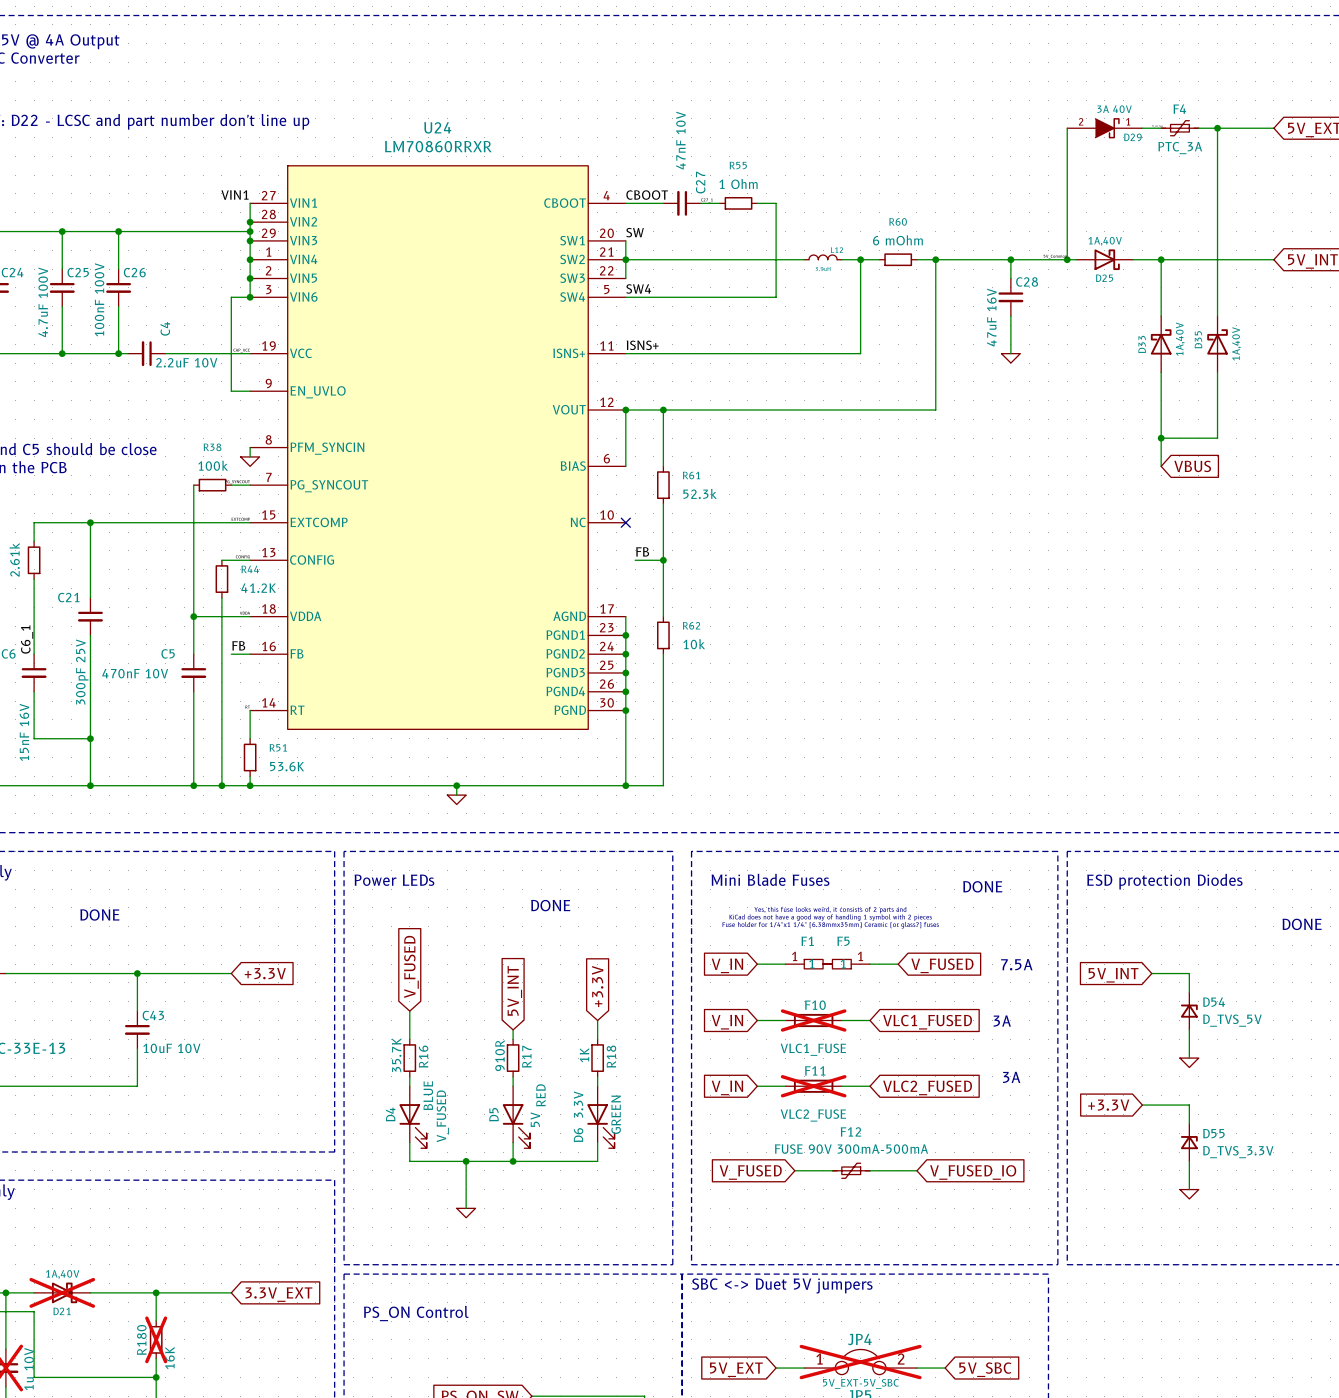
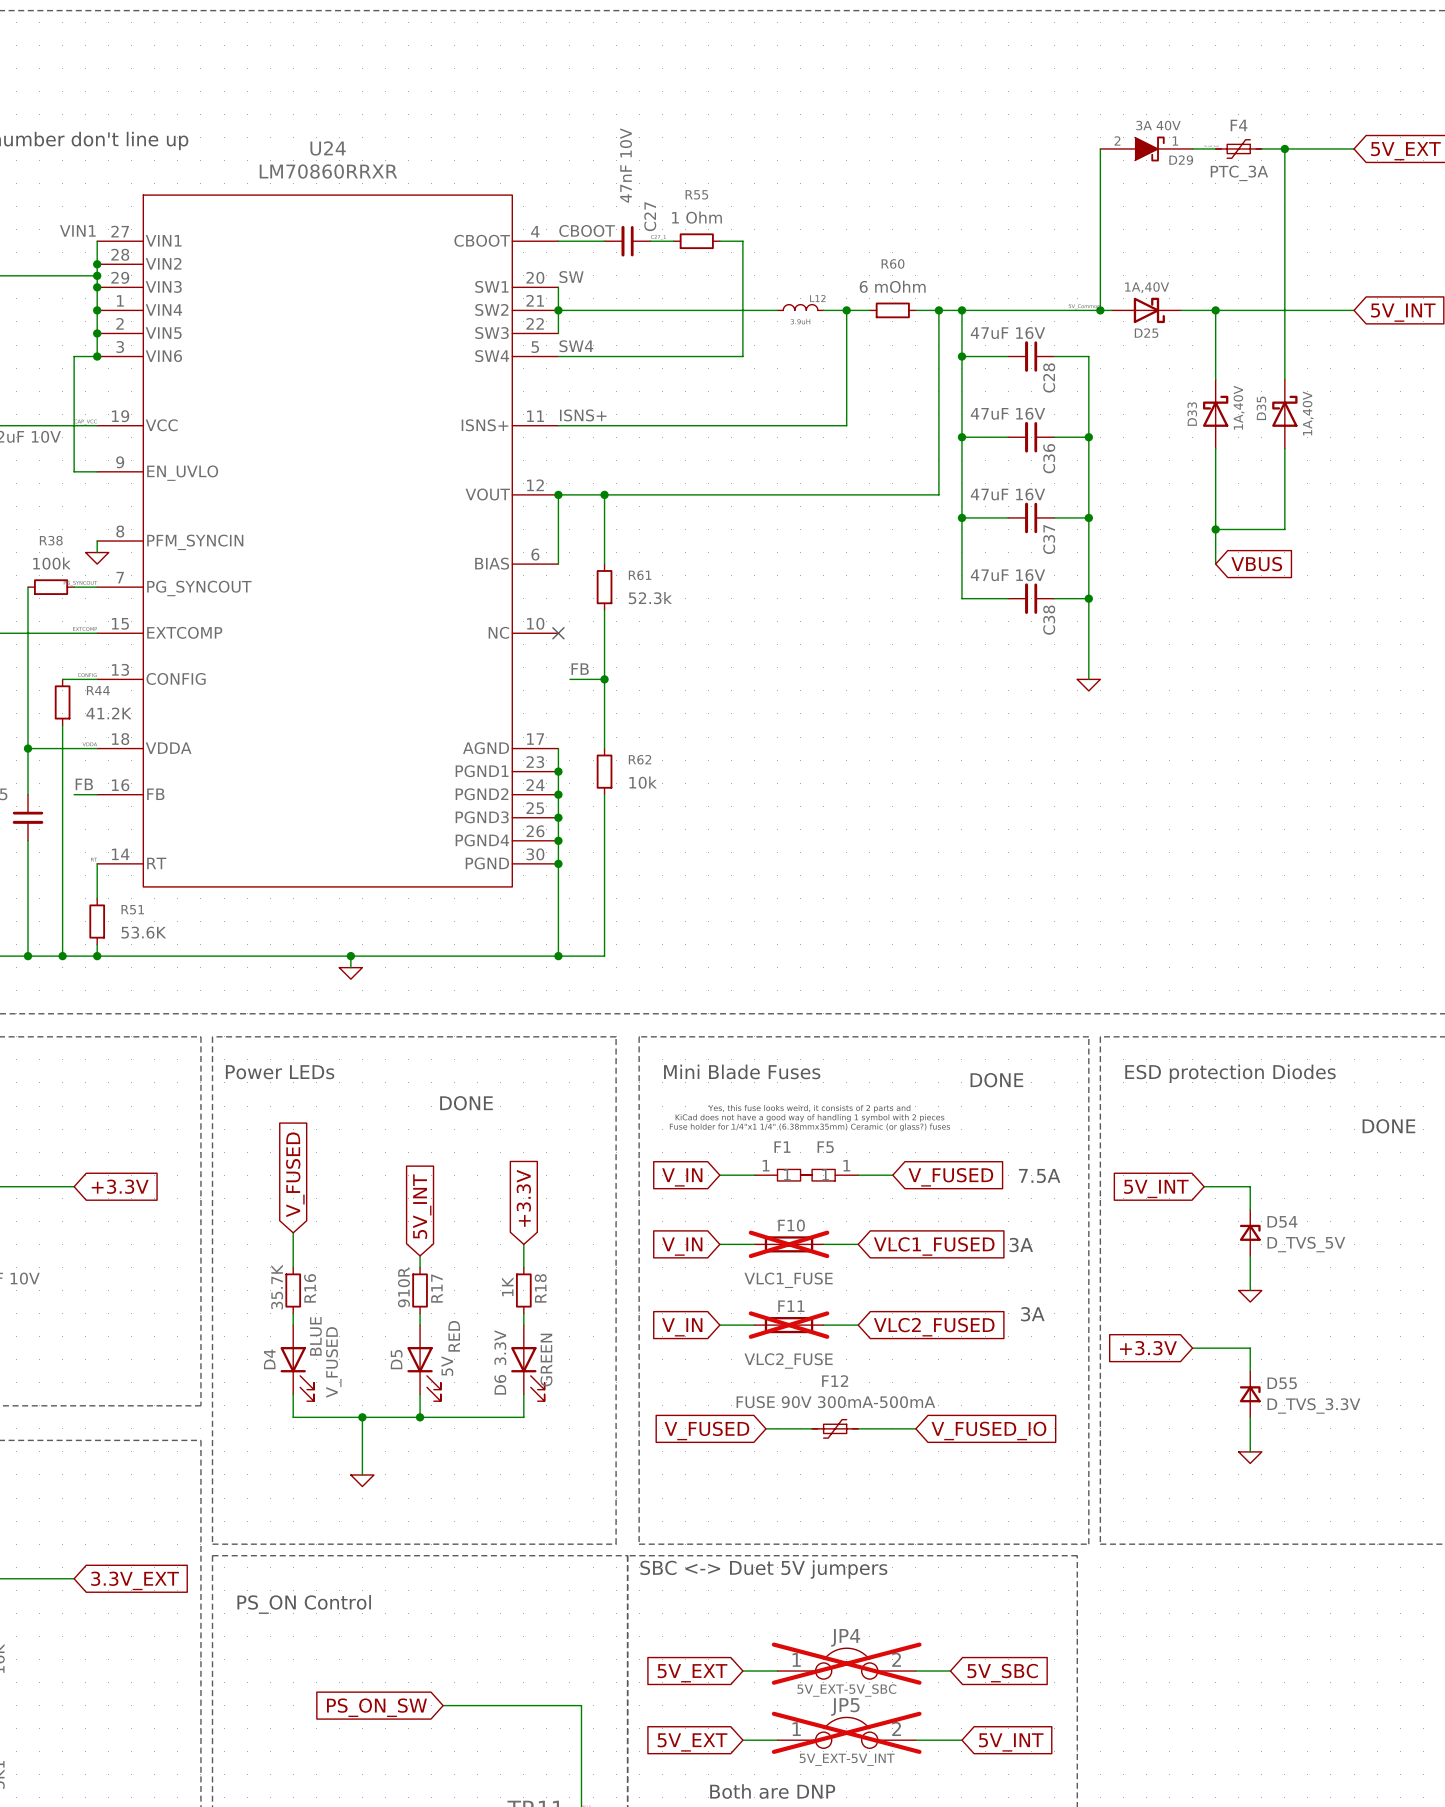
wire: none -> (961, 310) (961, 598) (1008, 598)
junction: none -> (961, 310)
wire: (1010, 259) (1010, 278) -> none
junction: (1010, 259) -> none
wire: none -> (961, 356) (1008, 356)
junction: none -> (961, 356)
C28 rotation: 0° (1010, 297) -> 90° clockwise (1031, 356)
wire: none -> (1054, 356) (1088, 356) (1088, 679)
wire: (1010, 316) (1010, 353) -> none
power symbol: (1010, 358) -> none
wire: none -> (961, 437) (1008, 437)
junction: none -> (961, 437)
C36: none -> 47uF 16V (1031, 437)
wire: none -> (1054, 437) (1088, 437)
junction: none -> (1088, 437)
wire: none -> (961, 517) (1008, 517)
junction: none -> (961, 517)
C37: none -> 47uF 16V (1031, 517)
wire: none -> (1054, 517) (1088, 517)
junction: none -> (1088, 517)
C38: none -> 47uF 16V (1031, 598)
wire: none -> (1054, 598) (1088, 598)
junction: none -> (1088, 598)
power symbol: none -> (1088, 685)

